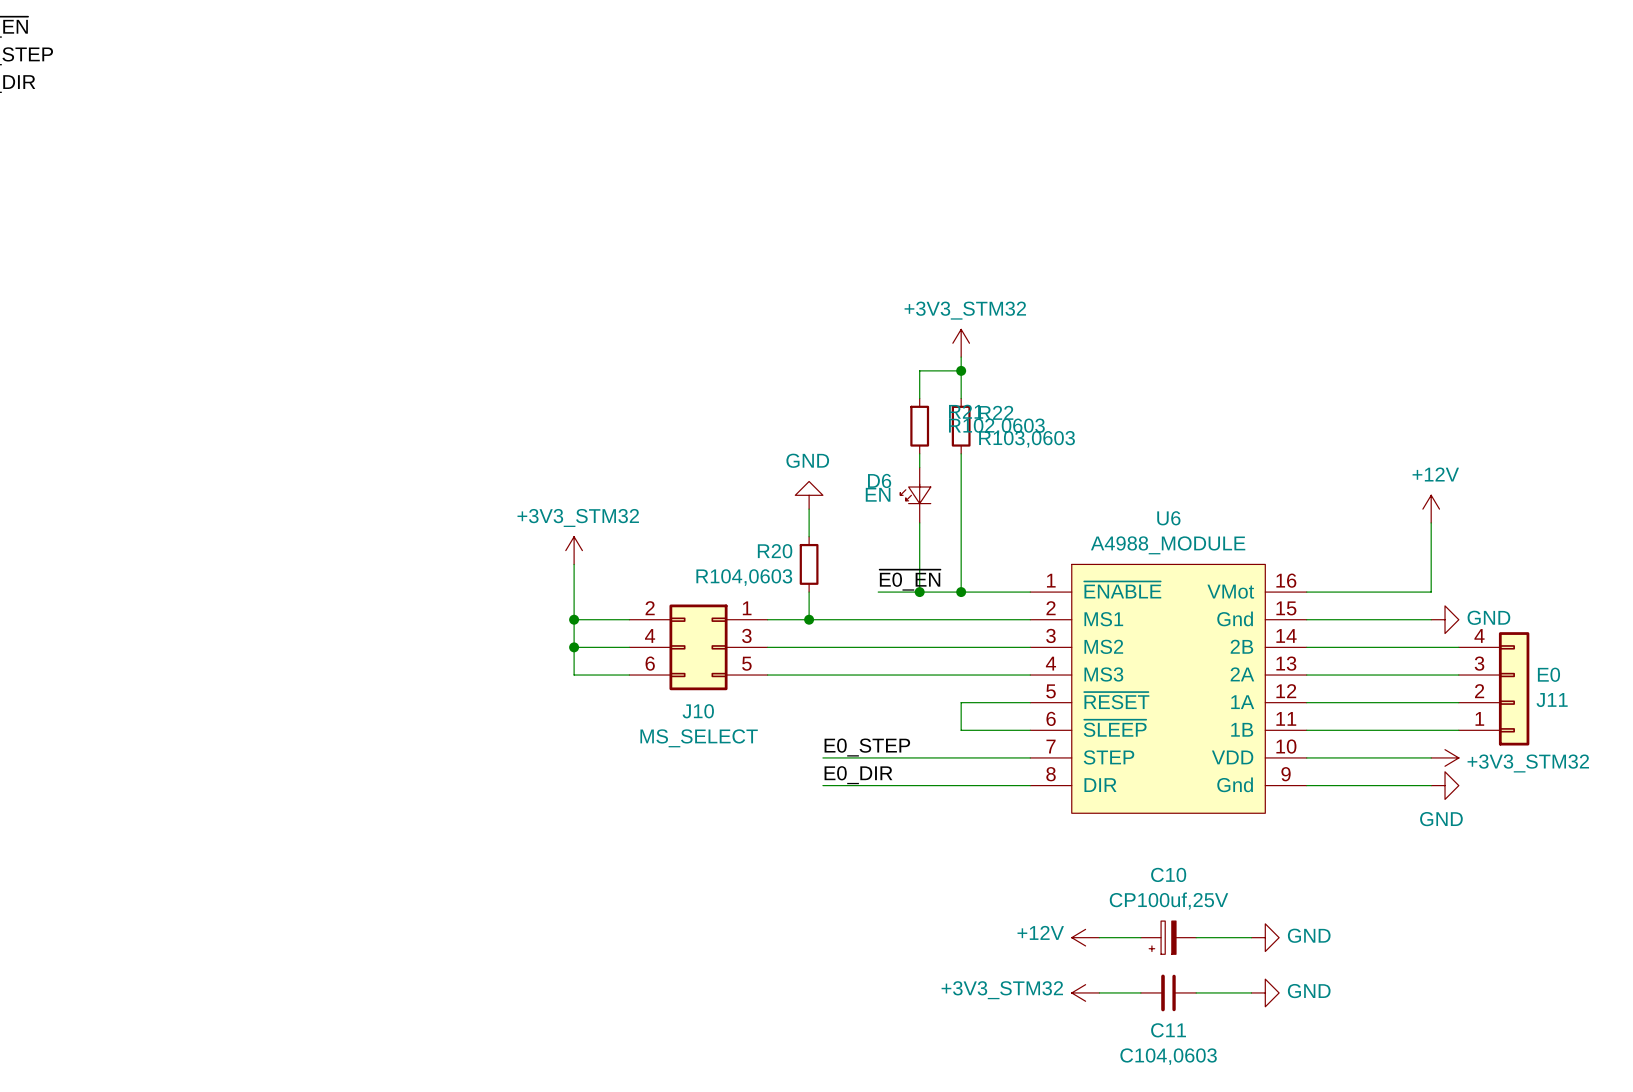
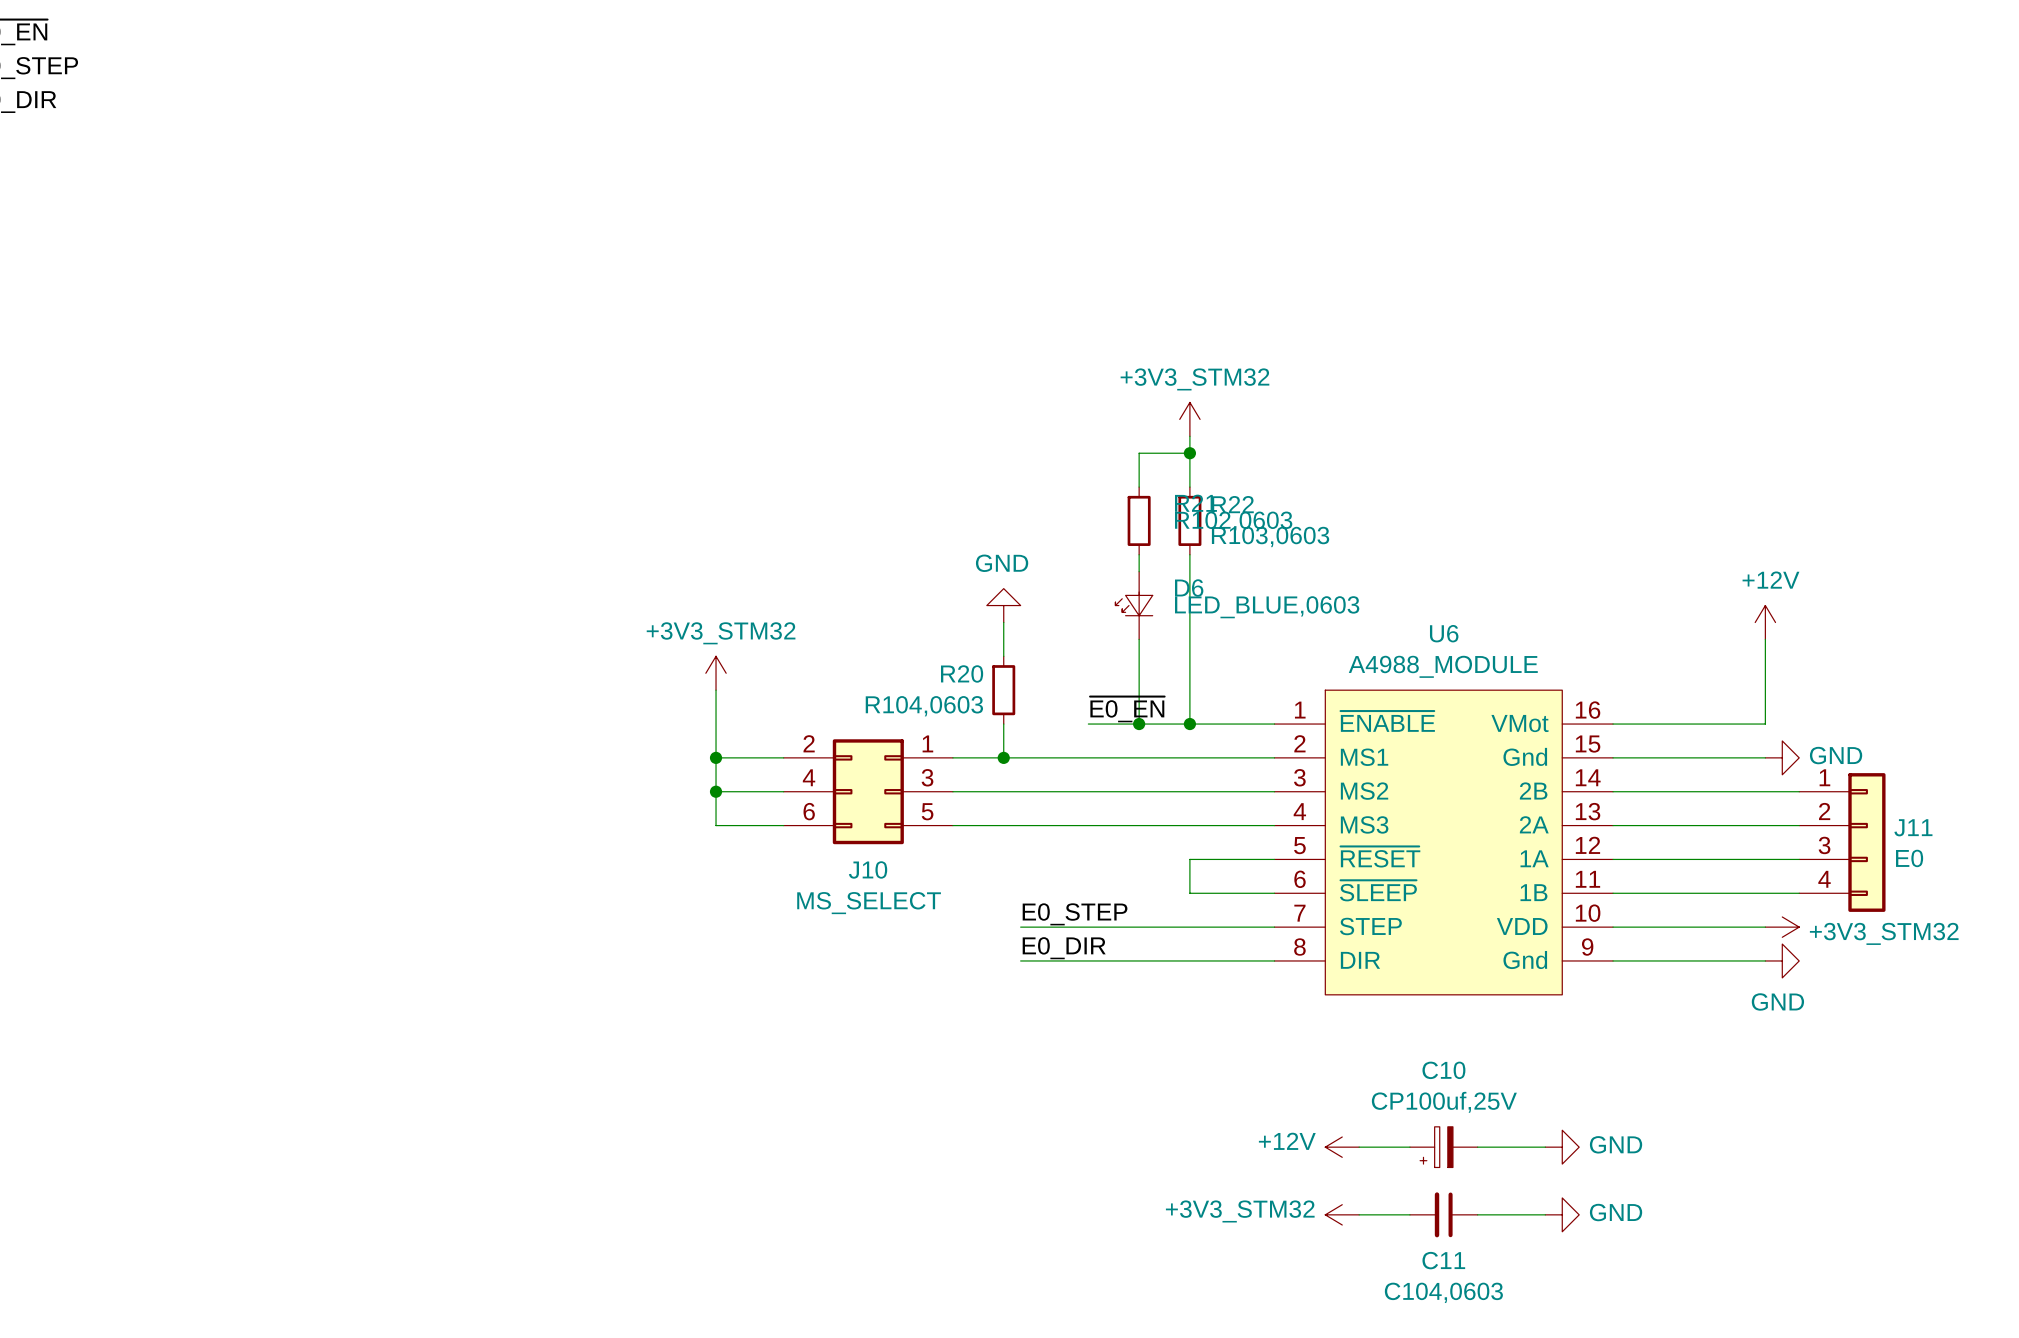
D6 name position: D6 (879, 480) -> D6 (1189, 587)
D6 value: EN (878, 494) -> LED_BLUE,0603 (1267, 607)
J11 flip: as is (1514, 688) -> up-down (1866, 842)

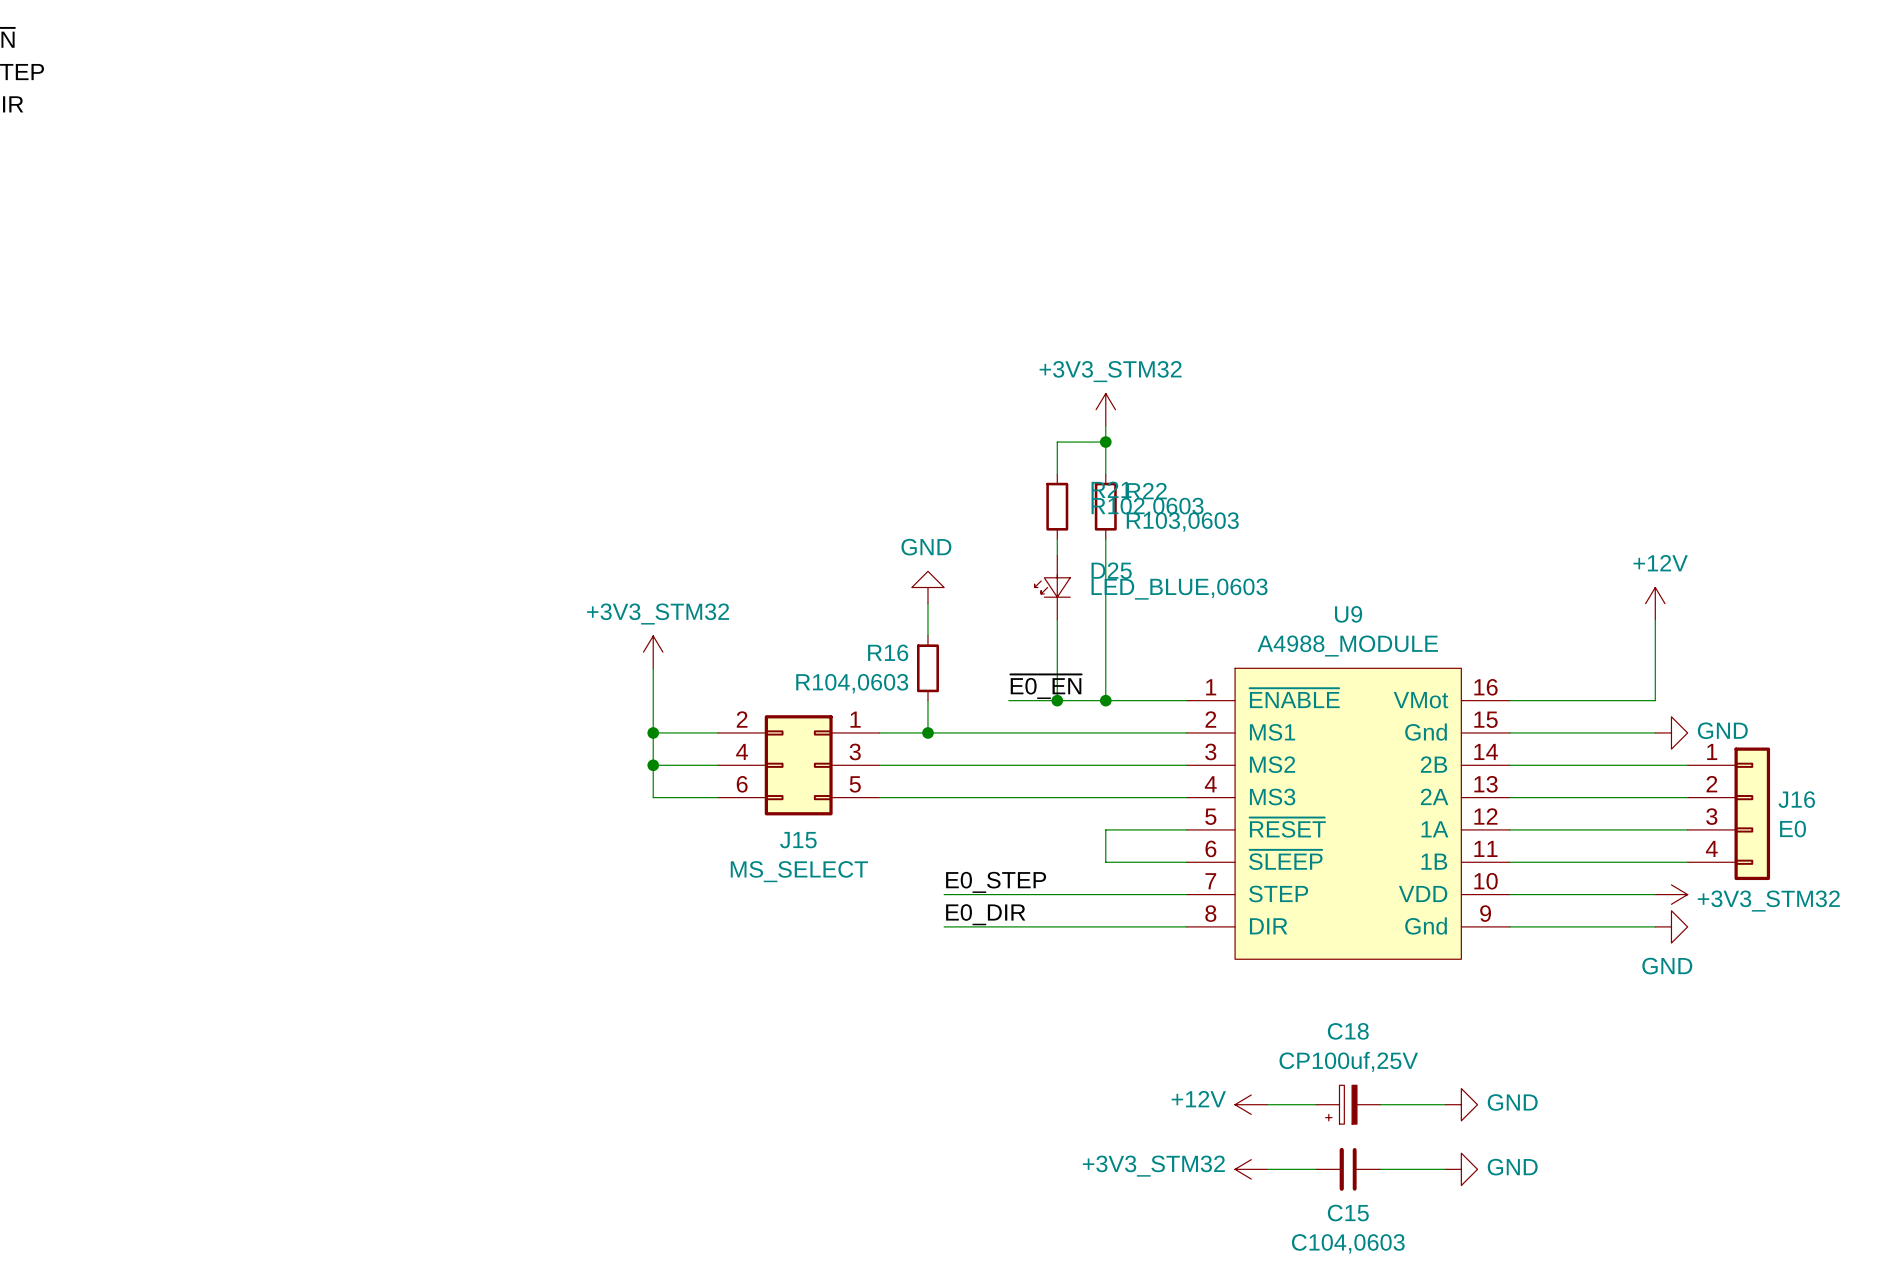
D6 name: D6 (1189, 587) -> D25 (1111, 570)
U6 name: U6 (1444, 633) -> U9 (1348, 614)
R20 name: R20 (962, 673) -> R16 (888, 652)
J11 name: J11 (1913, 827) -> J16 (1796, 799)
J10 name: J10 (868, 869) -> J15 (798, 840)
C10 name: C10 (1443, 1070) -> C18 (1348, 1031)
C11 name: C11 (1443, 1260) -> C15 (1348, 1213)

